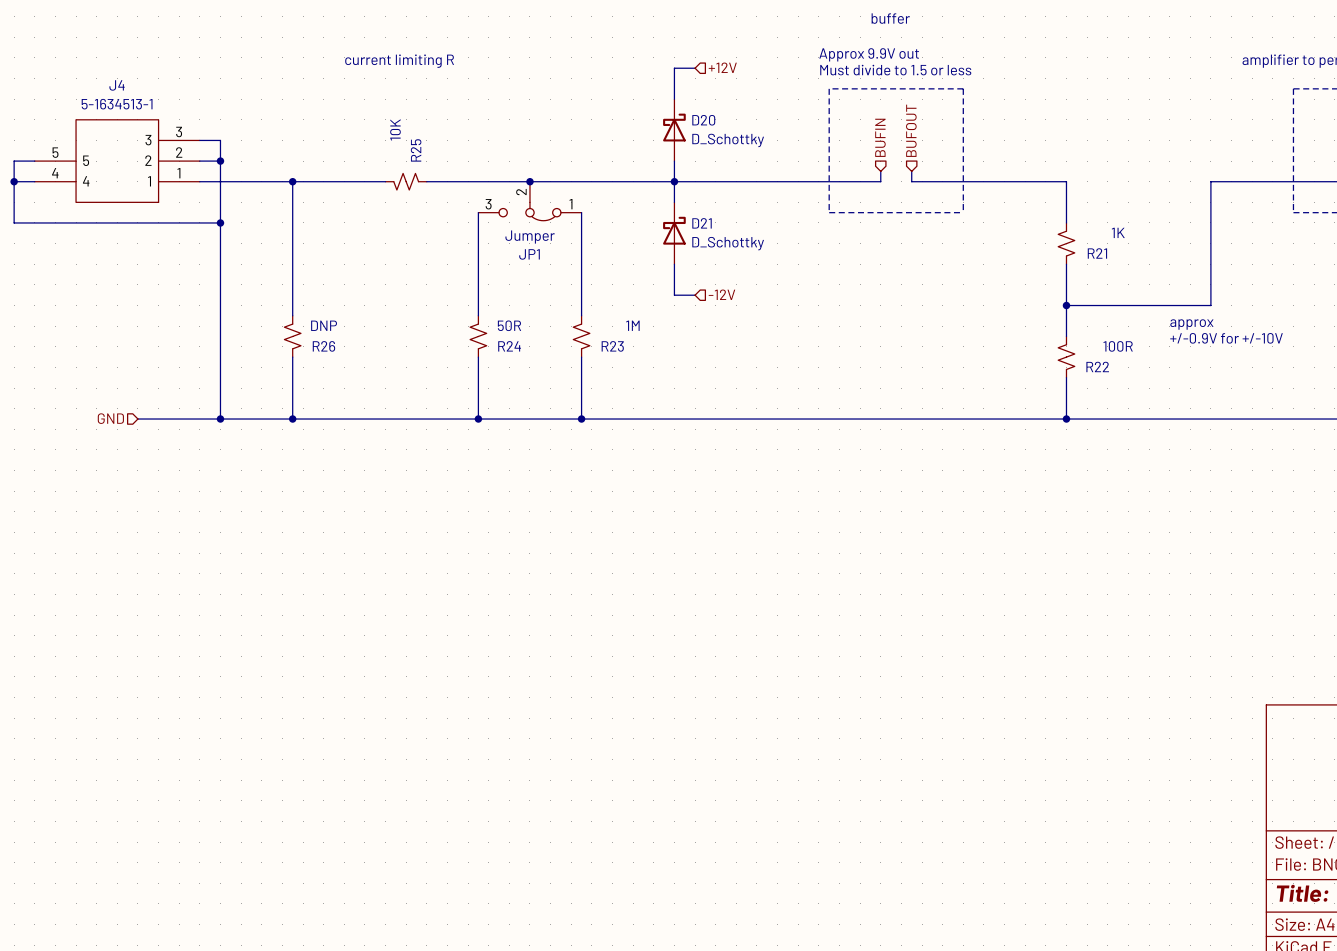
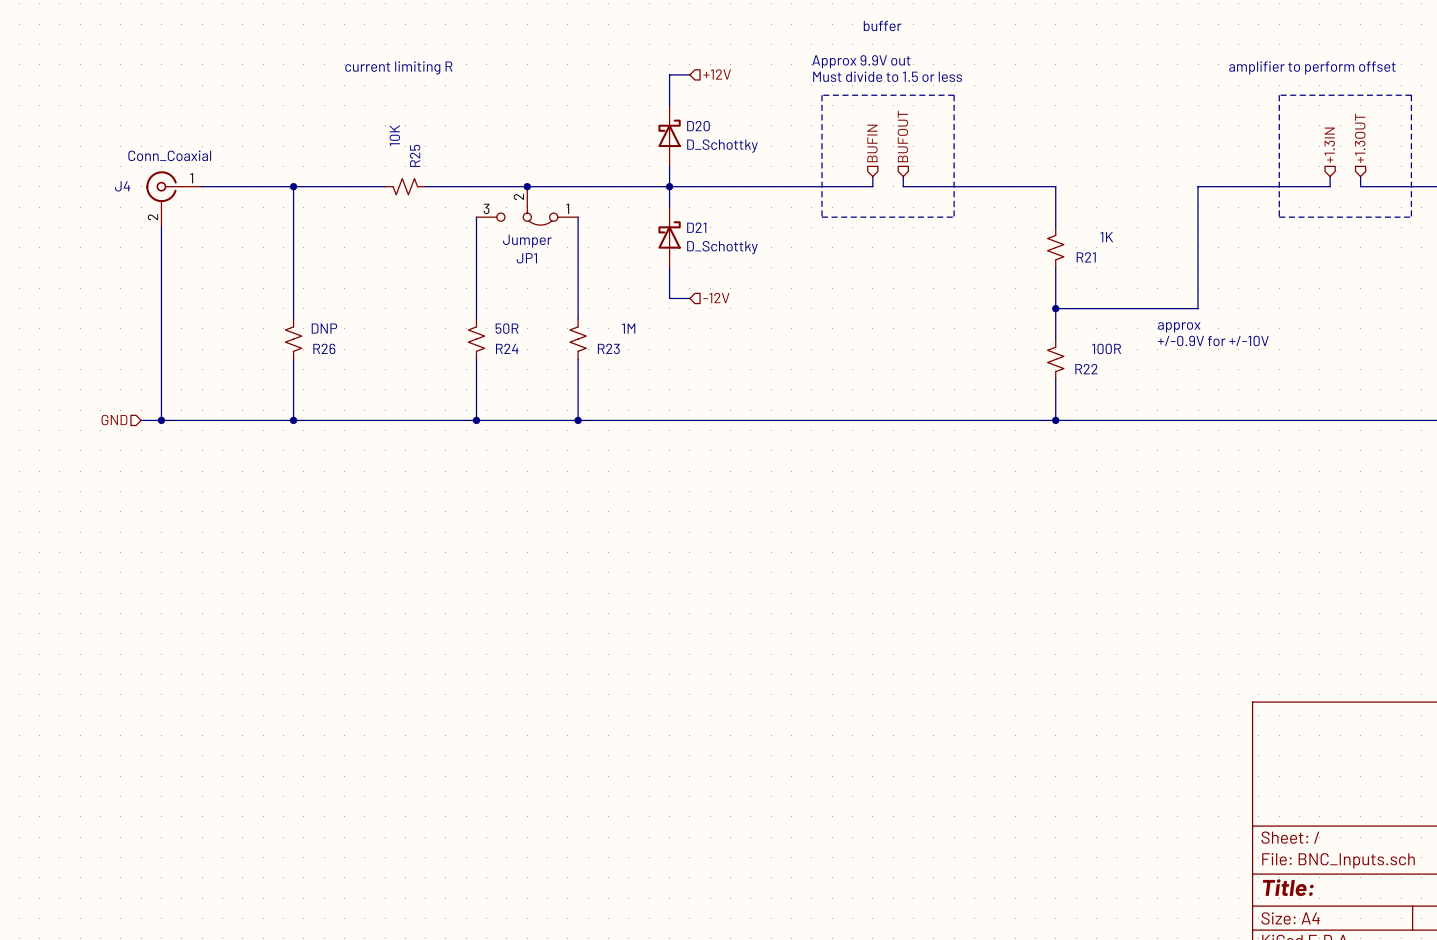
J4 name position: J4 (117, 85) -> J4 (122, 186)
J4 value: 5-1634513-1 (117, 104) -> Conn_Coaxial (169, 155)
J4 symbol: [34, 119, 200, 203] -> [146, 171, 203, 228]
wire: (199, 140) (220, 140) (220, 419) -> none
wire: (34, 161) (14, 161) (14, 222) (220, 222) -> none
wire: (199, 161) (220, 161) -> none
junction: (220, 161) -> none
wire: (14, 181) (34, 181) -> none
junction: (14, 181) -> none
wire: none -> (161, 227) (161, 420)
junction: (220, 222) -> none
junction: none -> (161, 420)
junction: (220, 419) -> none

